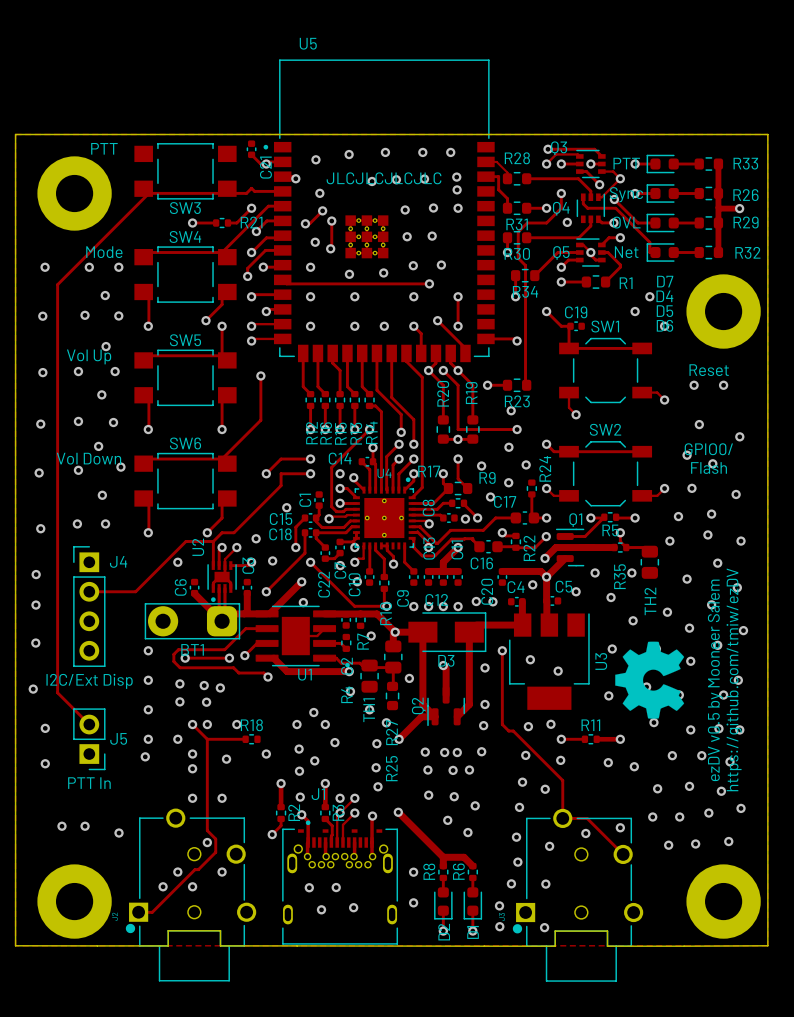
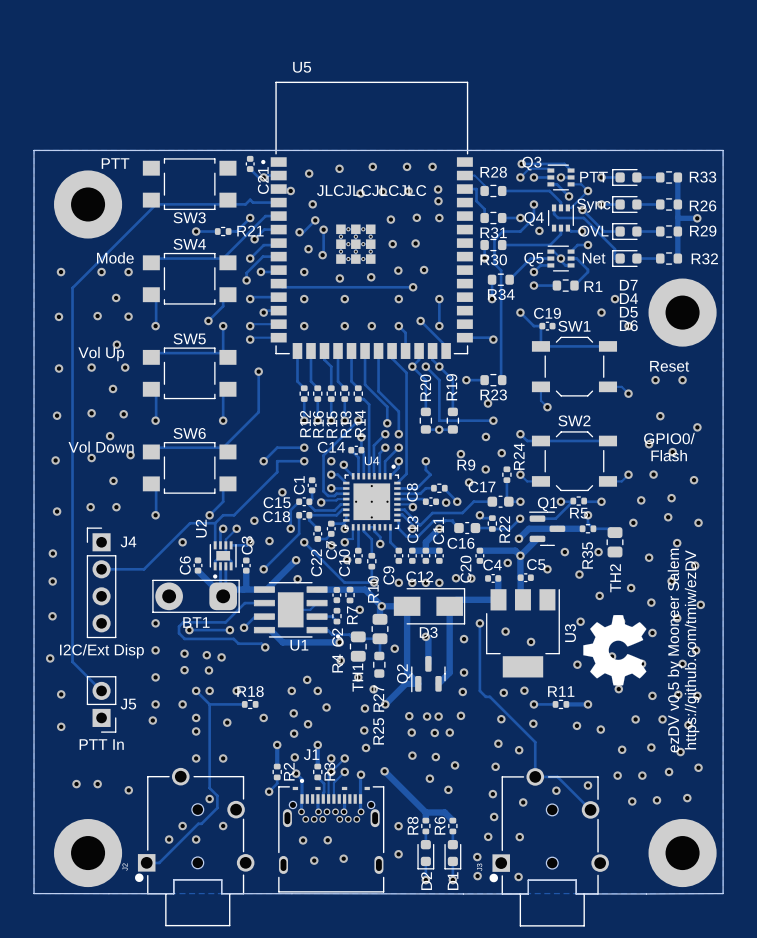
track: (458, 459) (458, 478) (467, 488) -> none
via: (458, 459) -> none
R17: (458, 488) -> none

